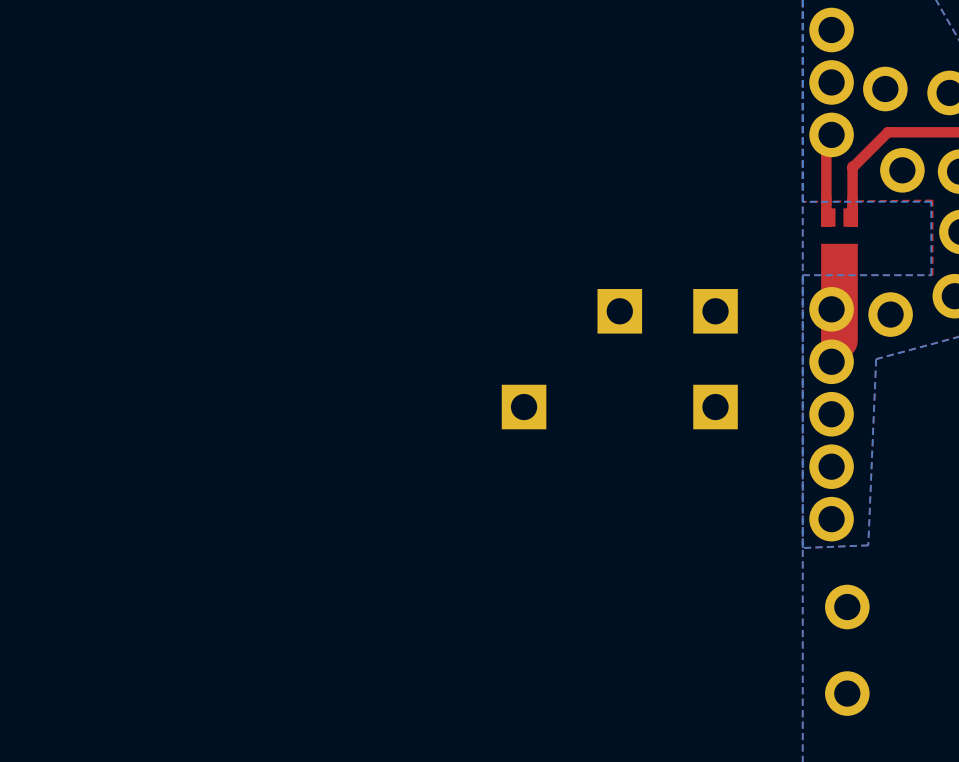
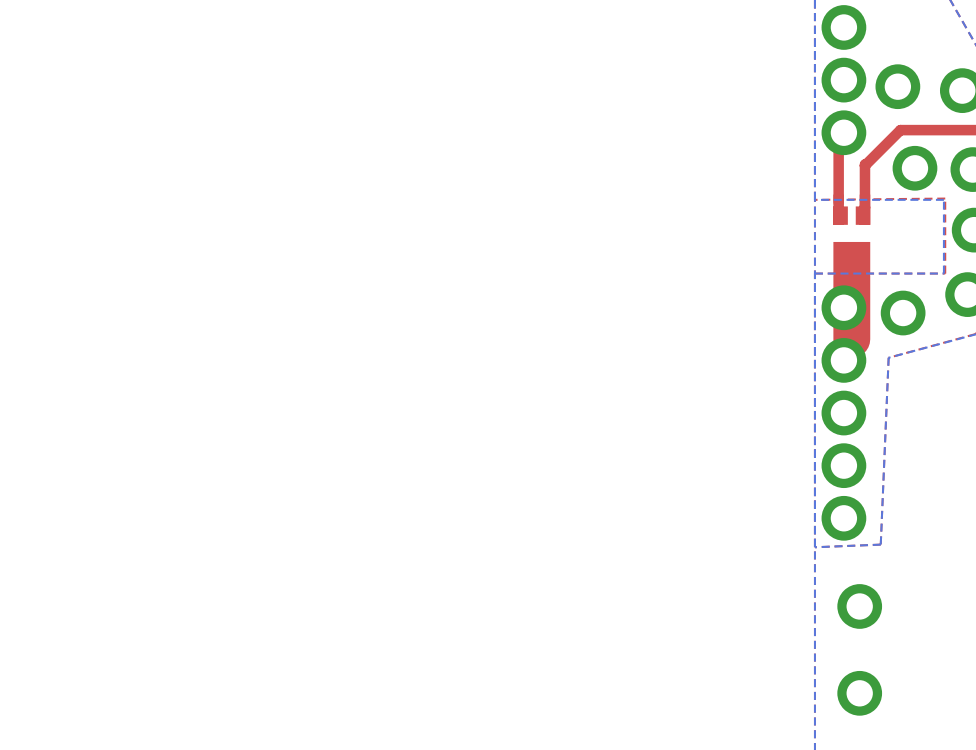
part: (619, 311) -> none
part: (715, 311) -> none
part: (524, 407) -> none
part: (715, 407) -> none

